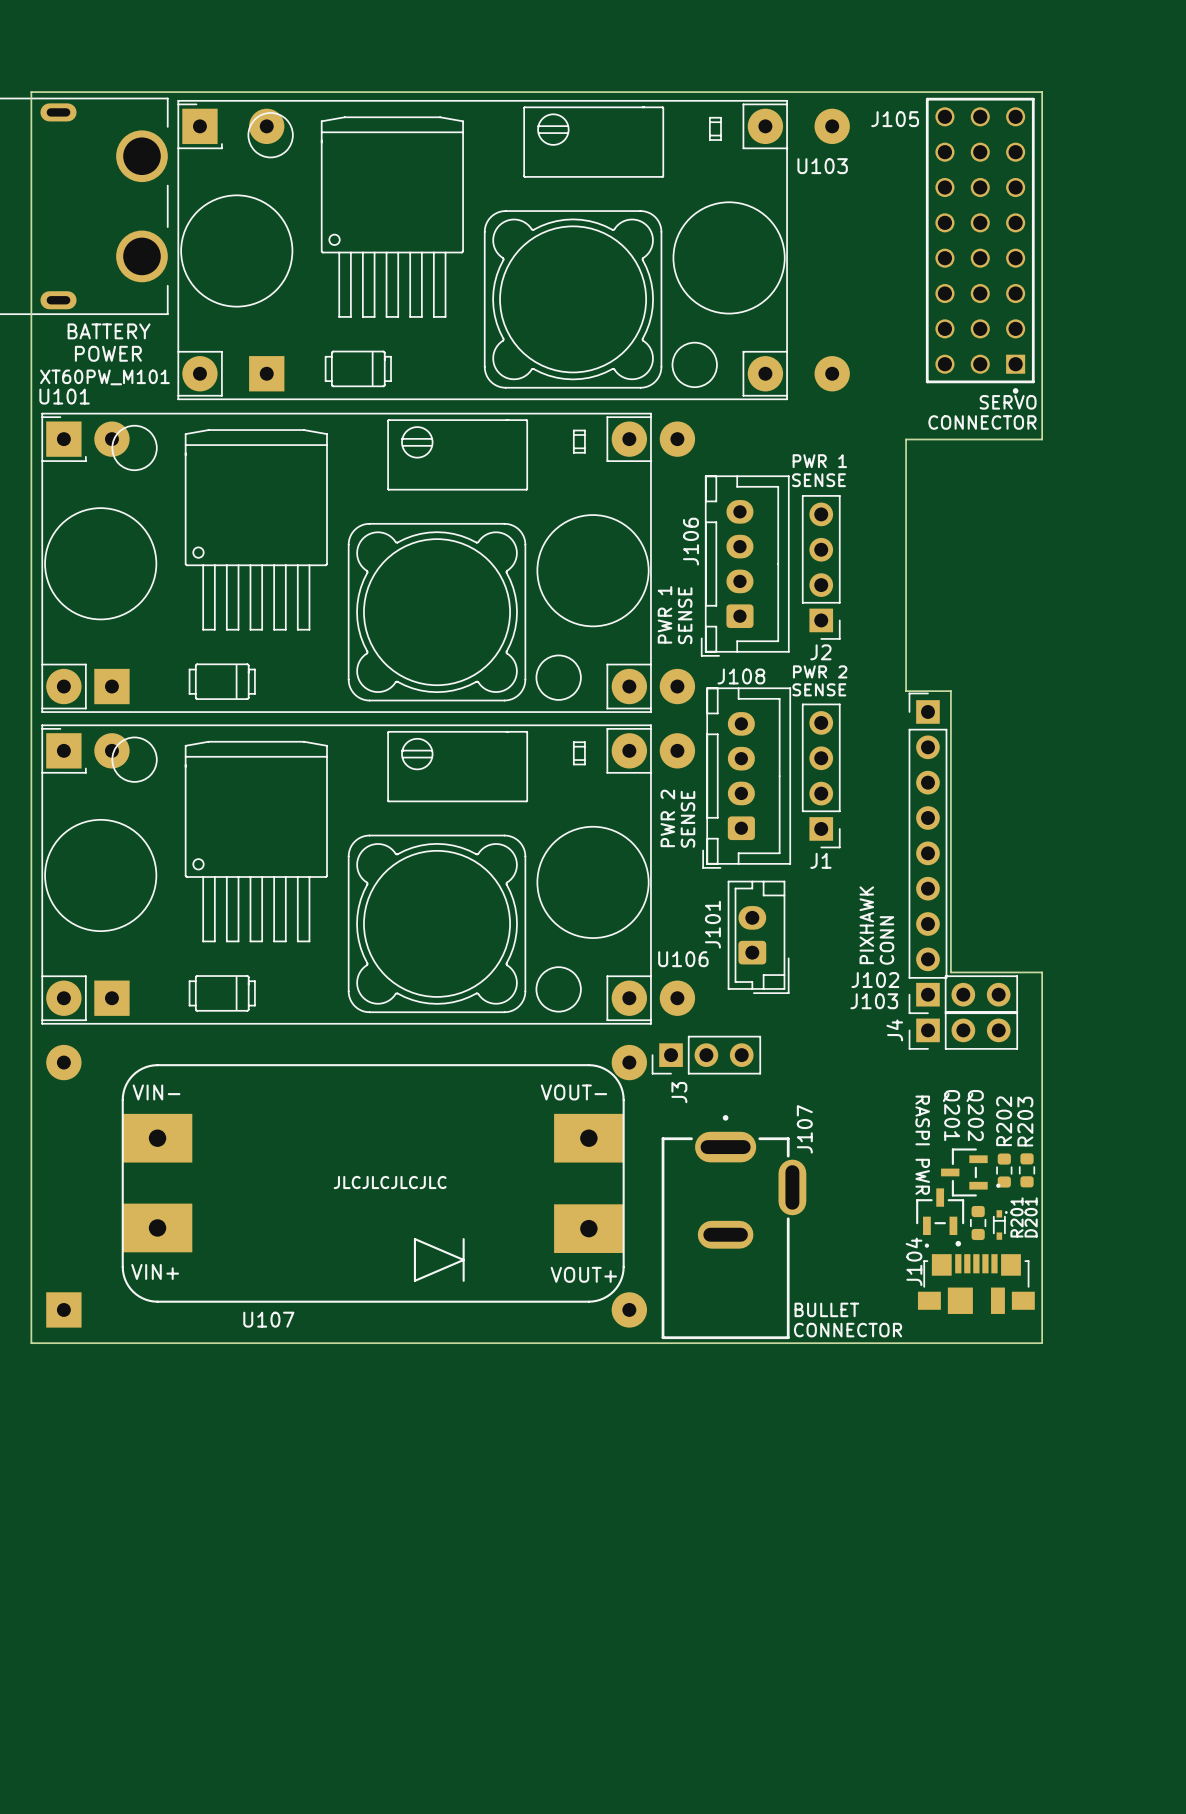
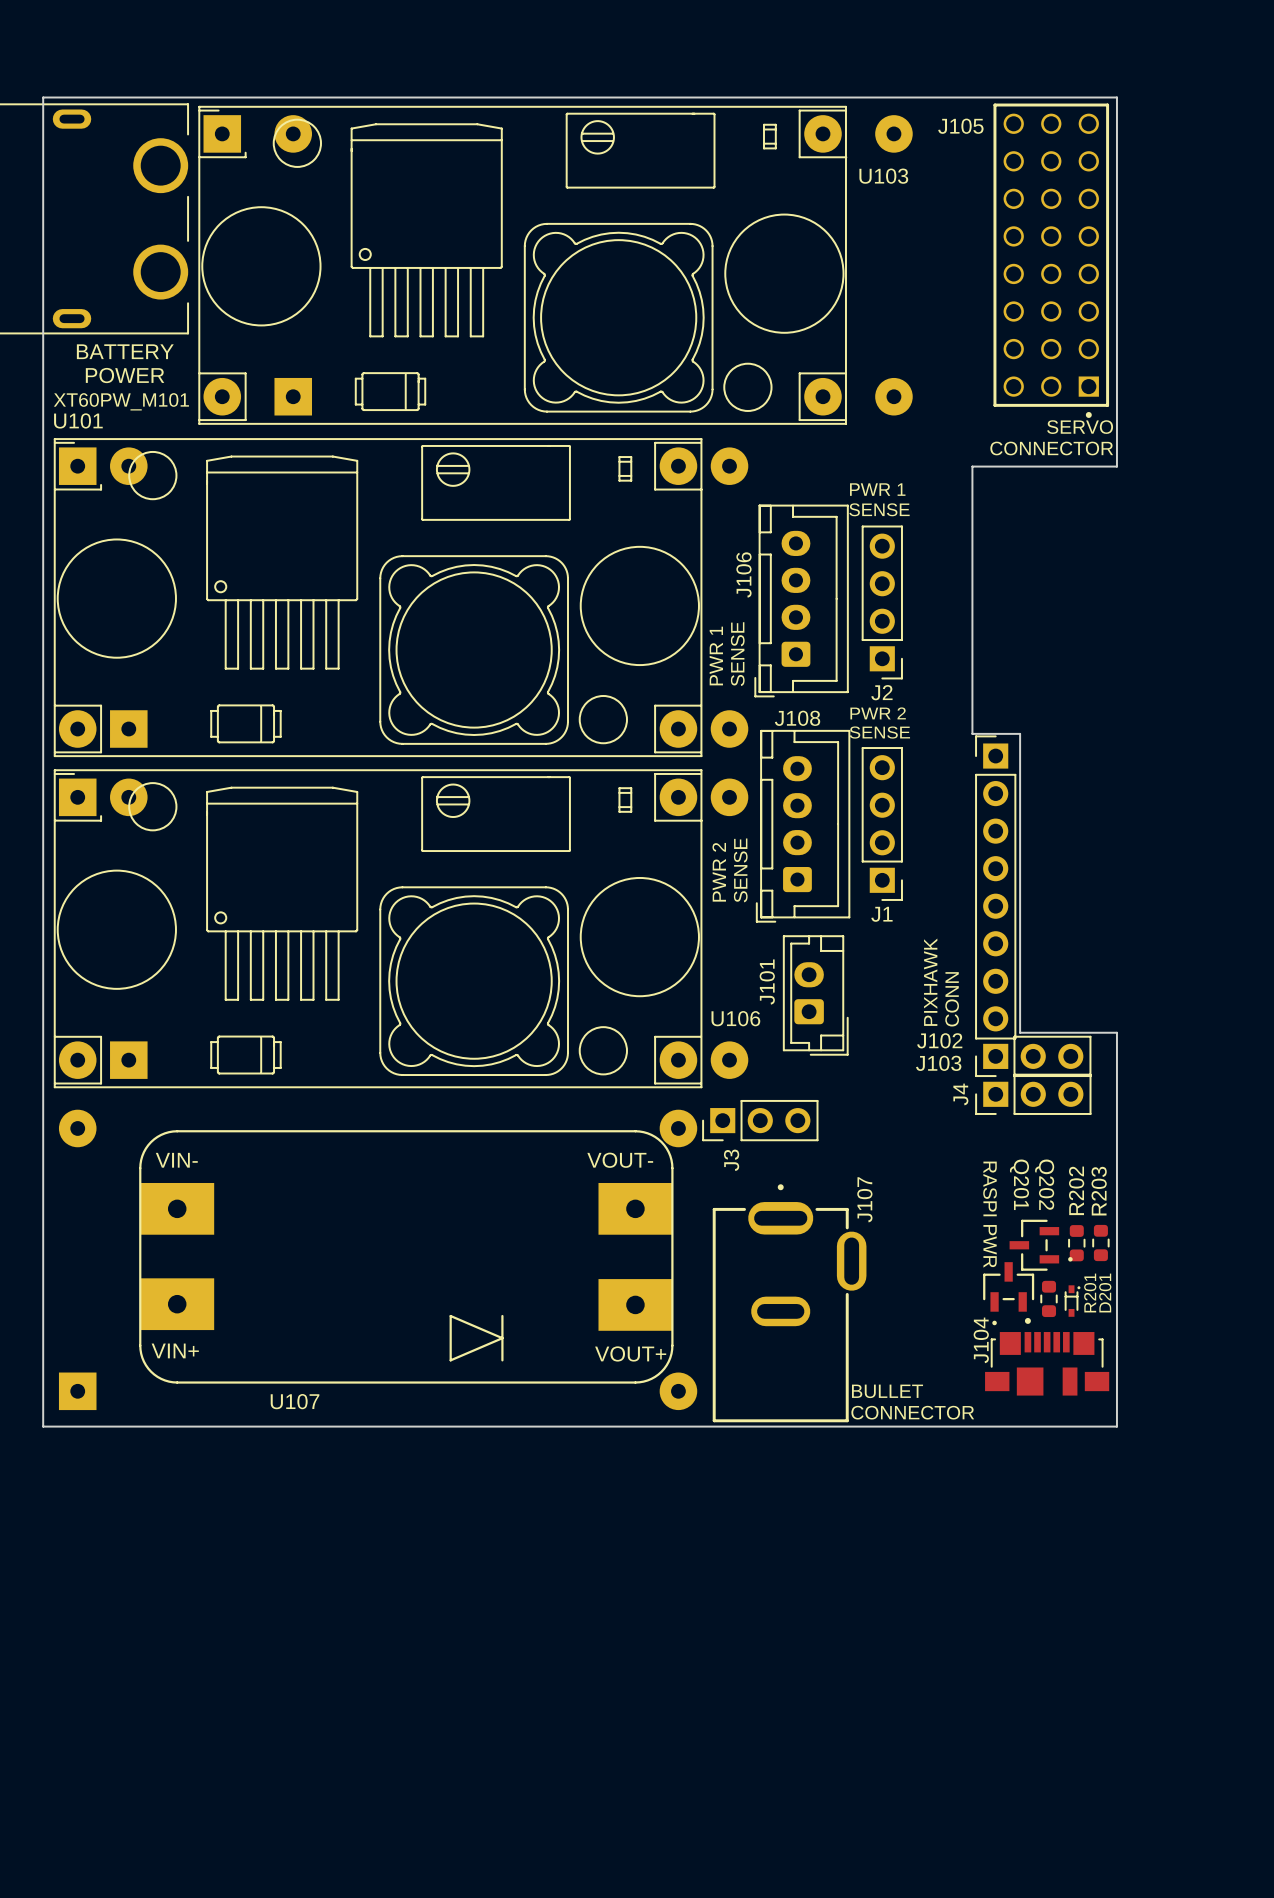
text: JLCJLCJLCJLC (390, 1182) -> none

